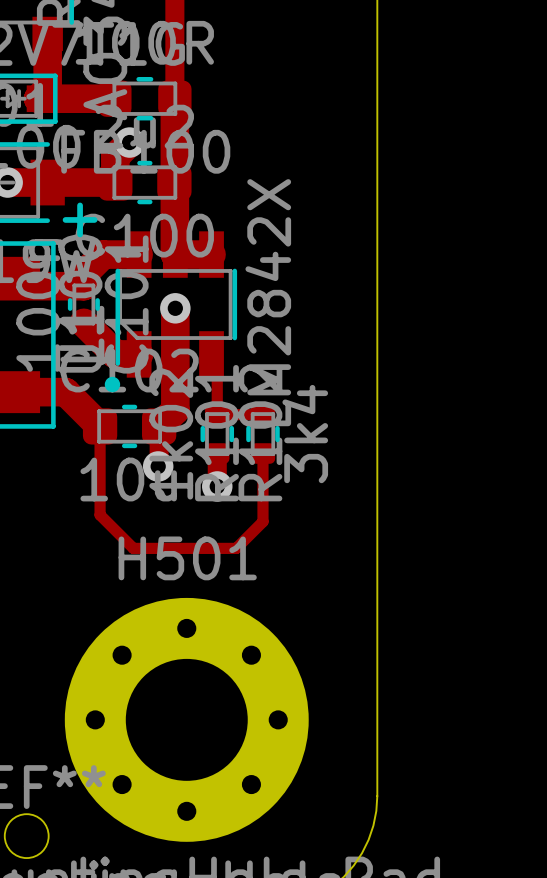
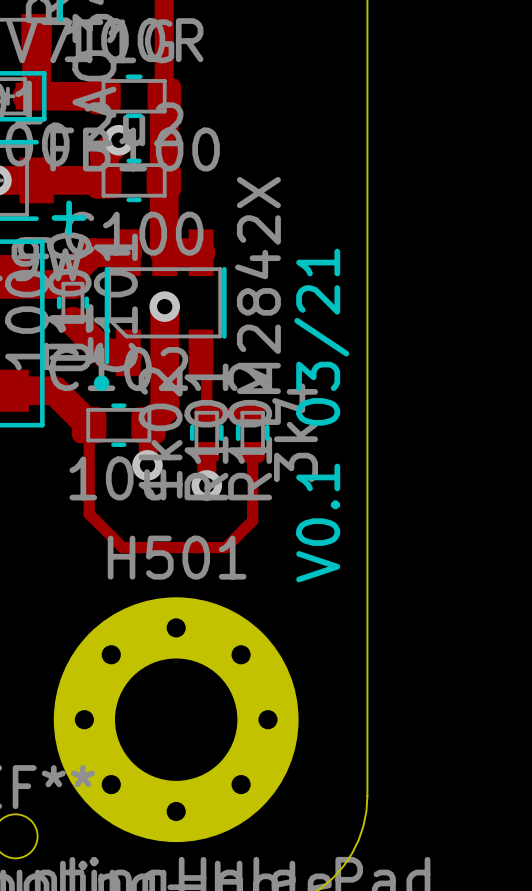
text: none -> V0.1 03/21 (321, 415)

